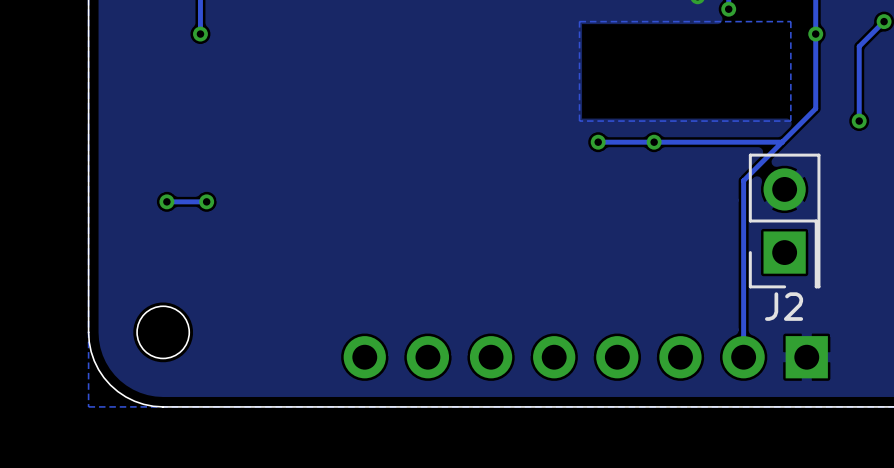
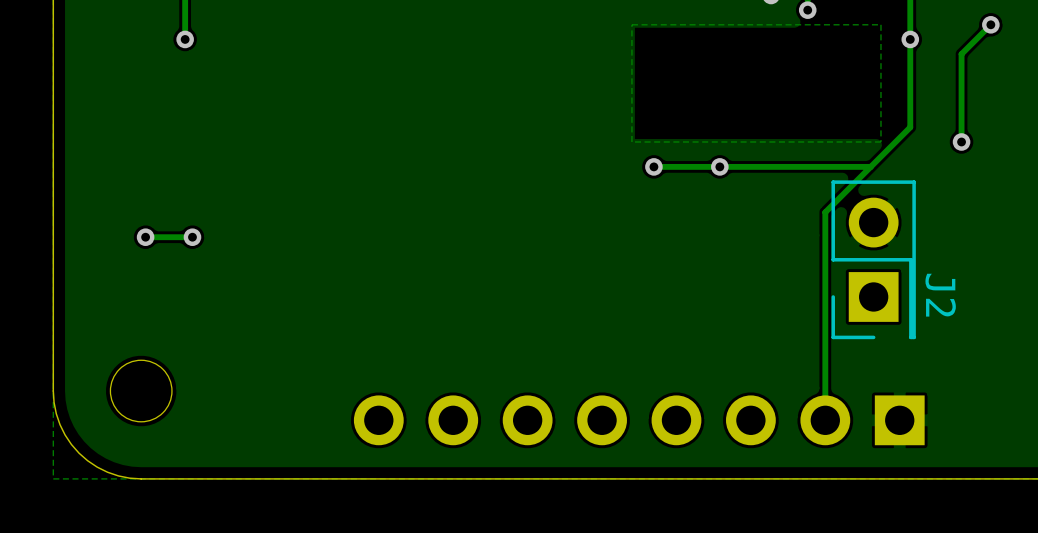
J2 name rotation: 0° (784, 306) -> 90° clockwise (940, 295)
J2 name position: J2 (784, 306) -> J2 (940, 295)

